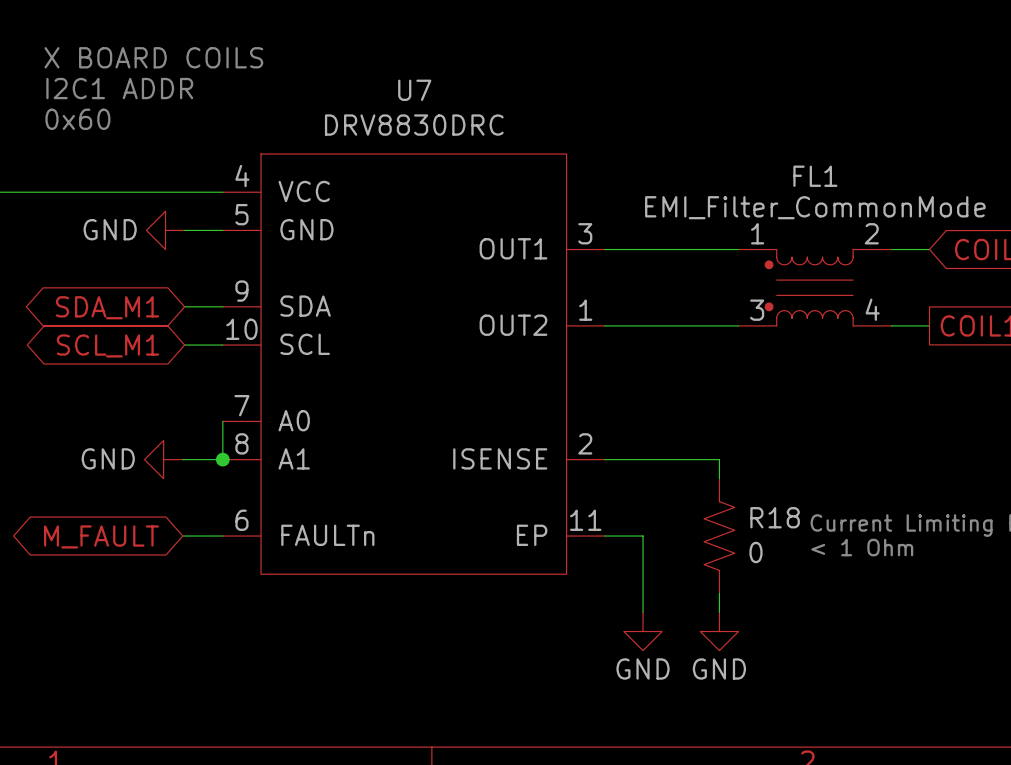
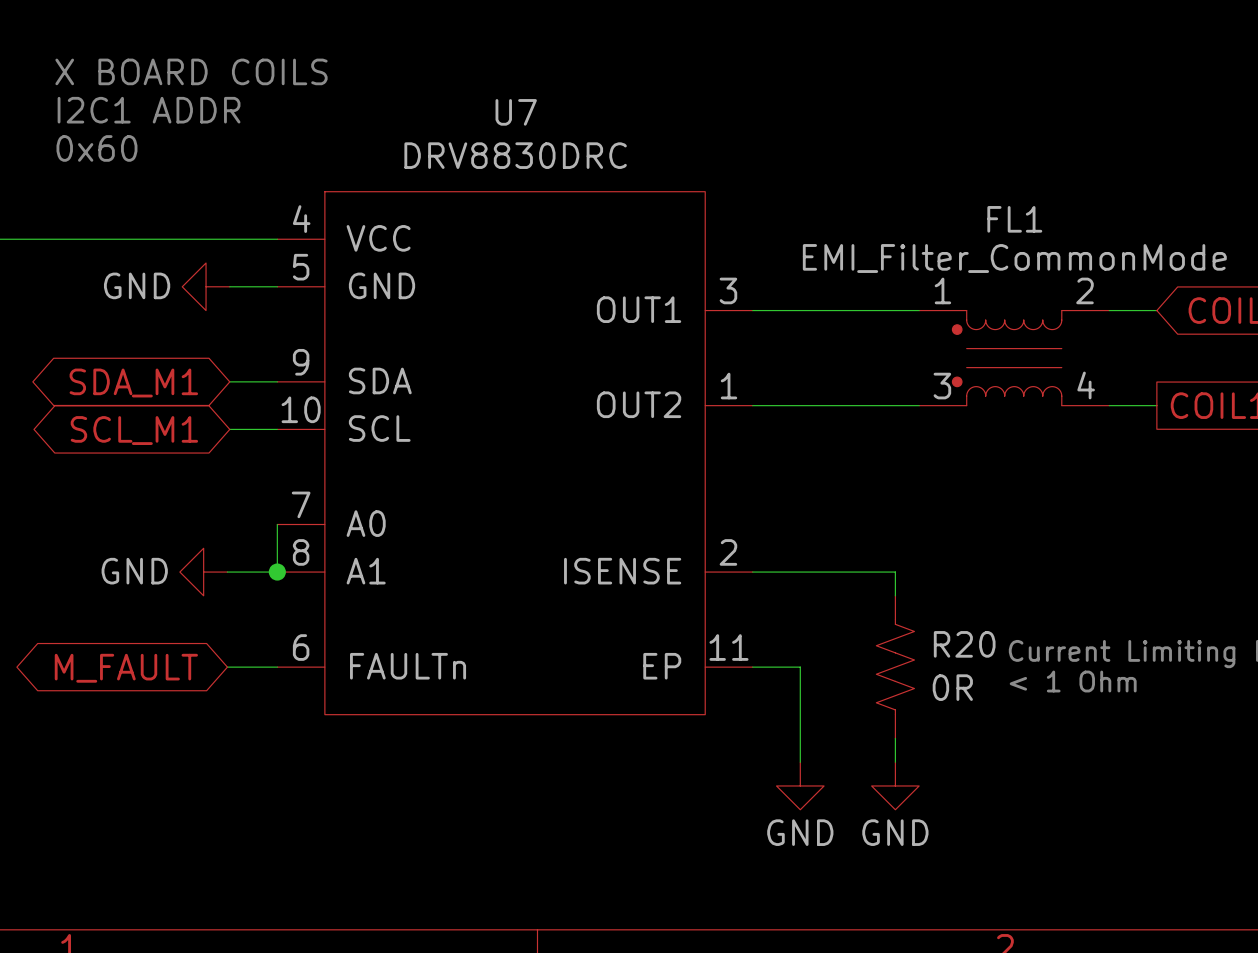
R18 name: R18 (775, 517) -> R20 (964, 644)
R18 value: 0 (756, 552) -> 0R (952, 687)

